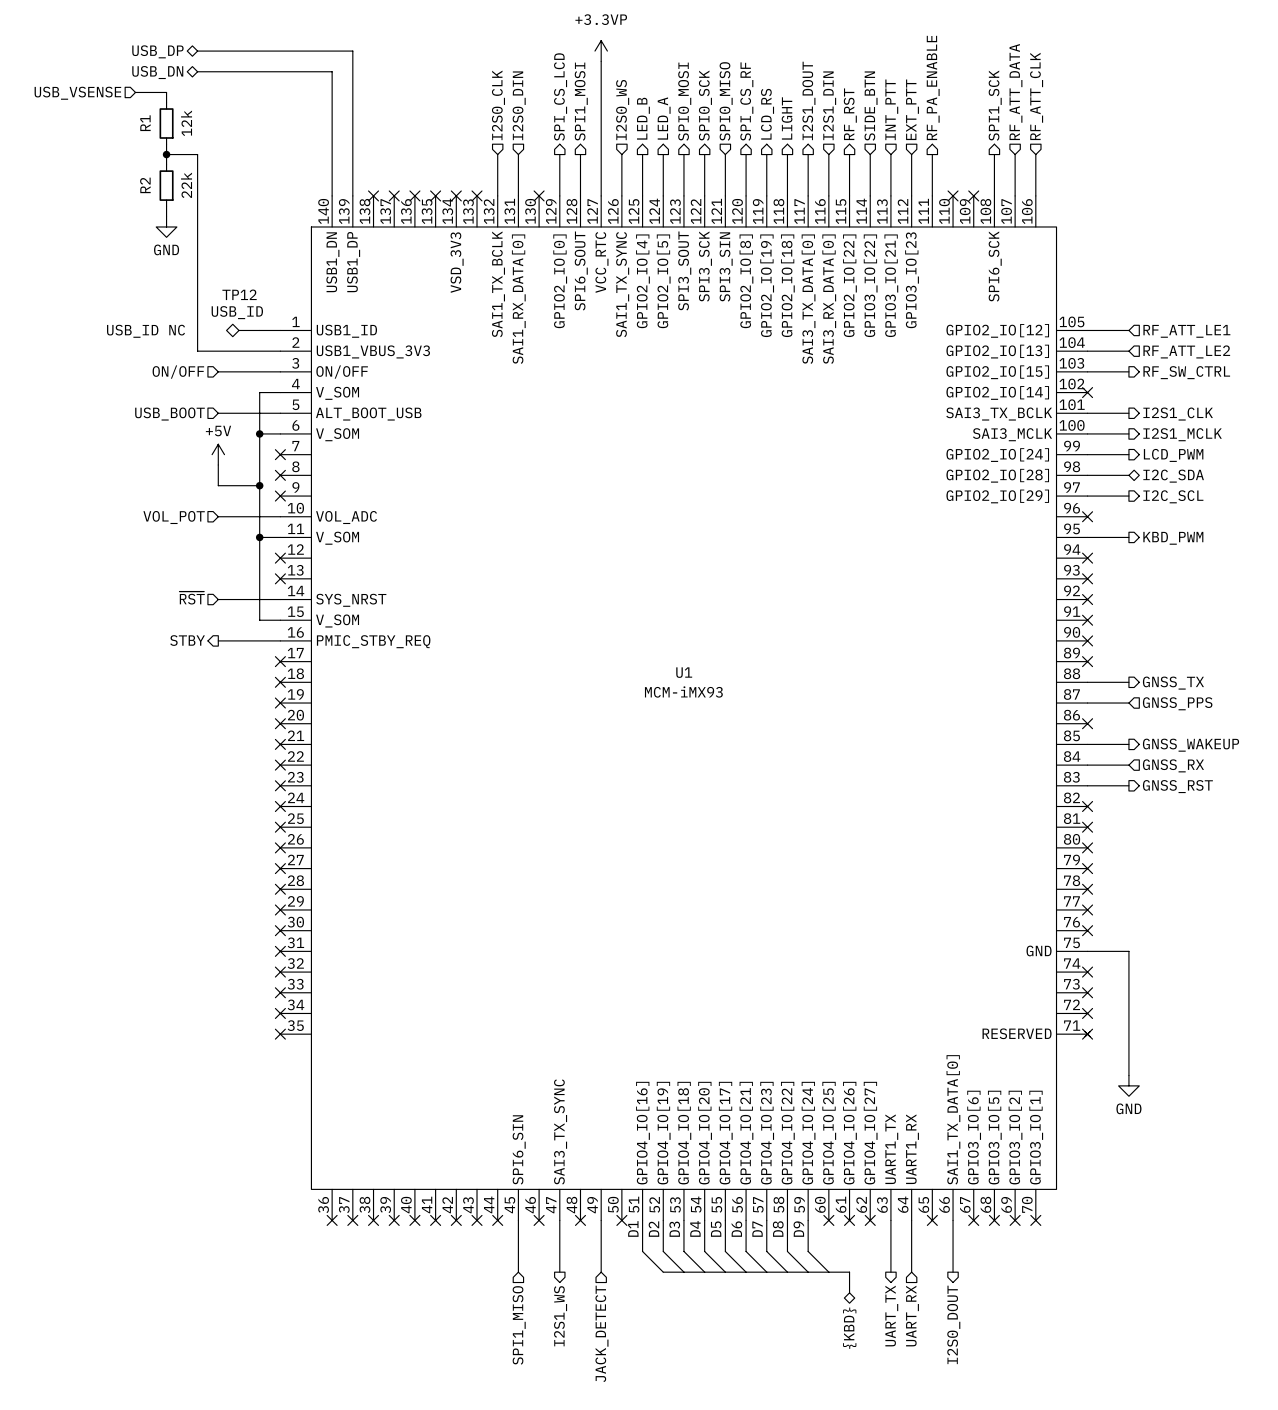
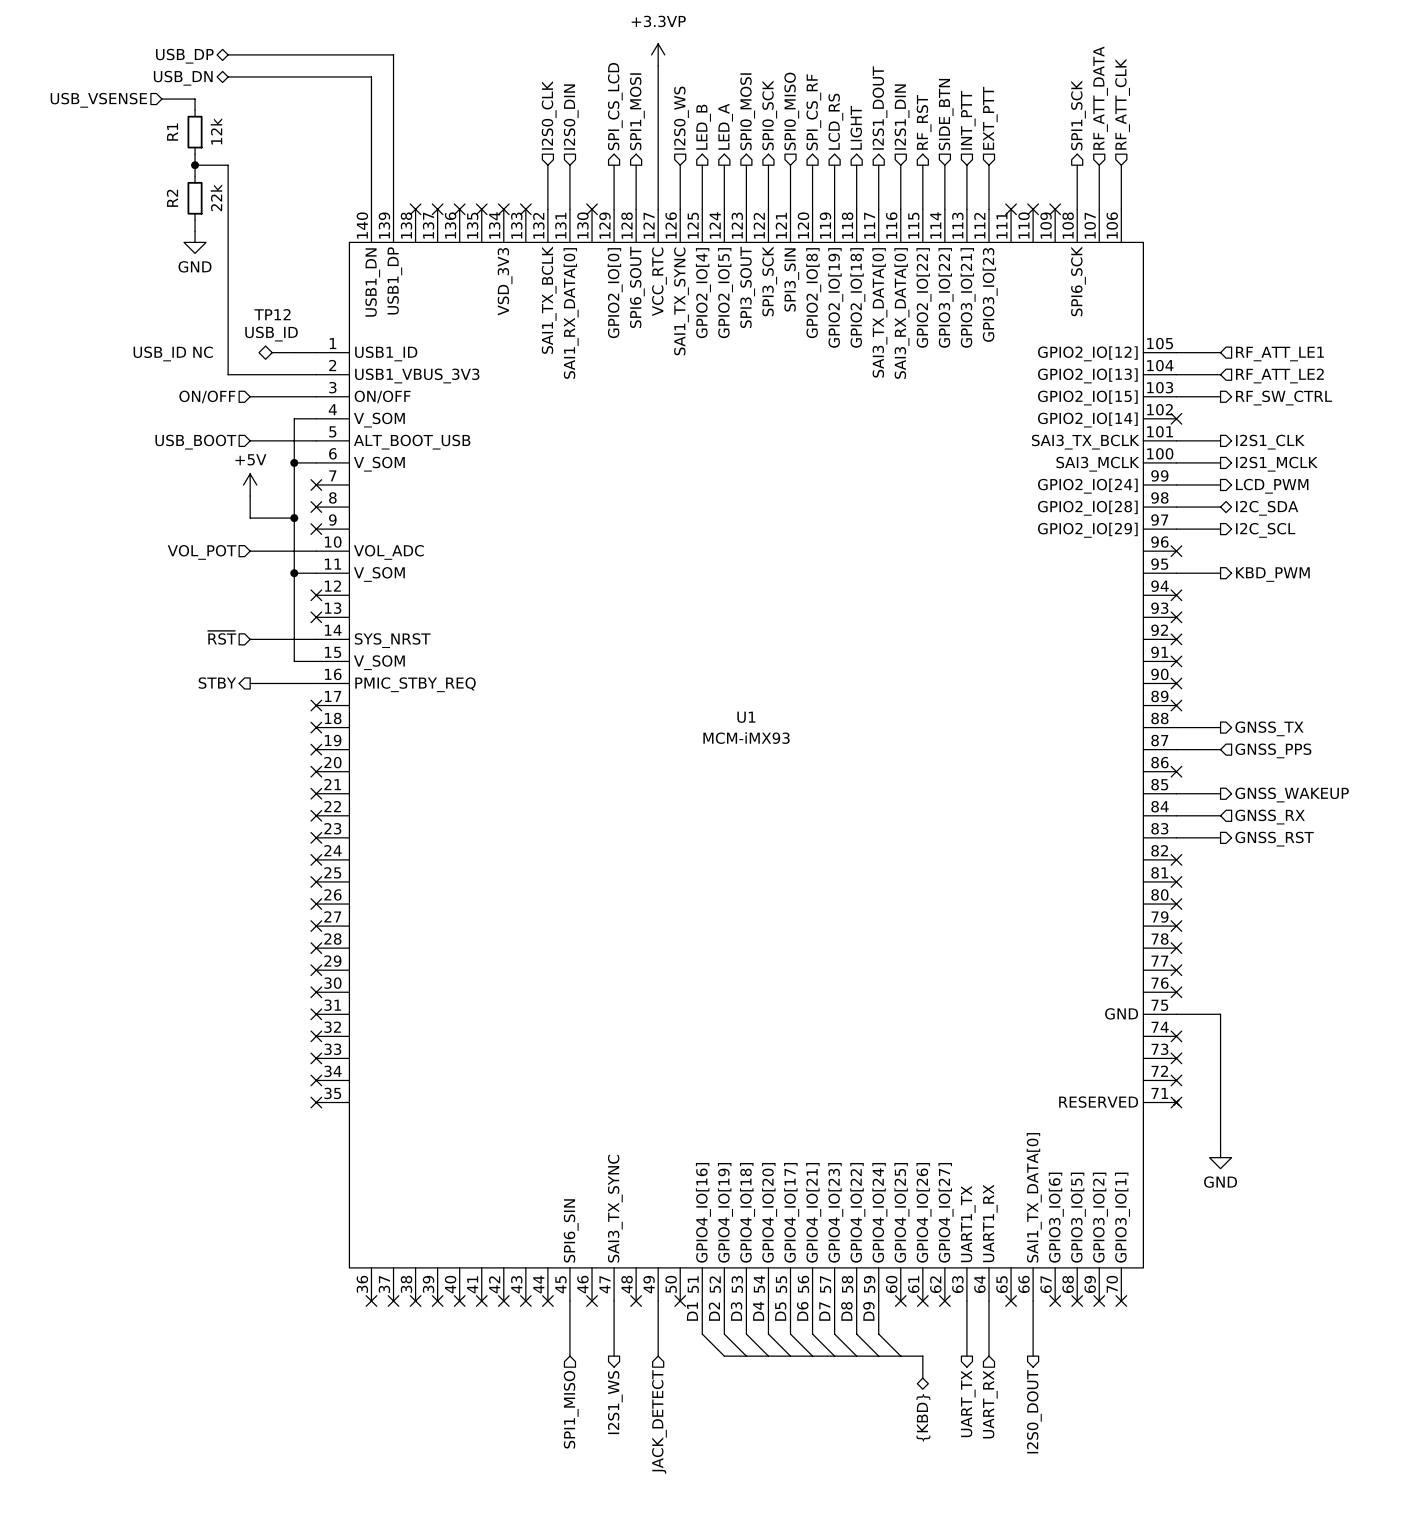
hierarchical label: RF_PA_ENABLE (933, 87) -> none
wire: (932, 154) (932, 195) -> none
no-connect mark: none -> (1011, 209)

